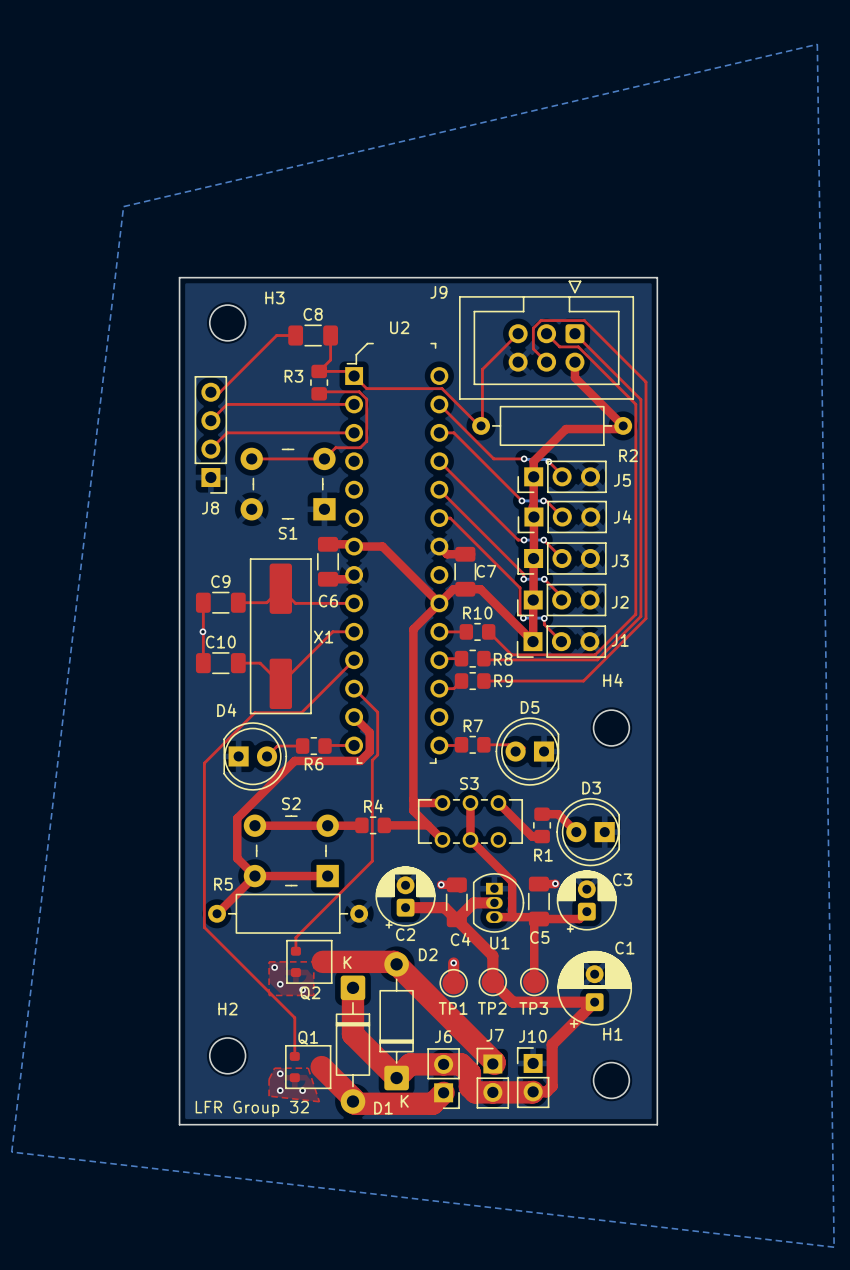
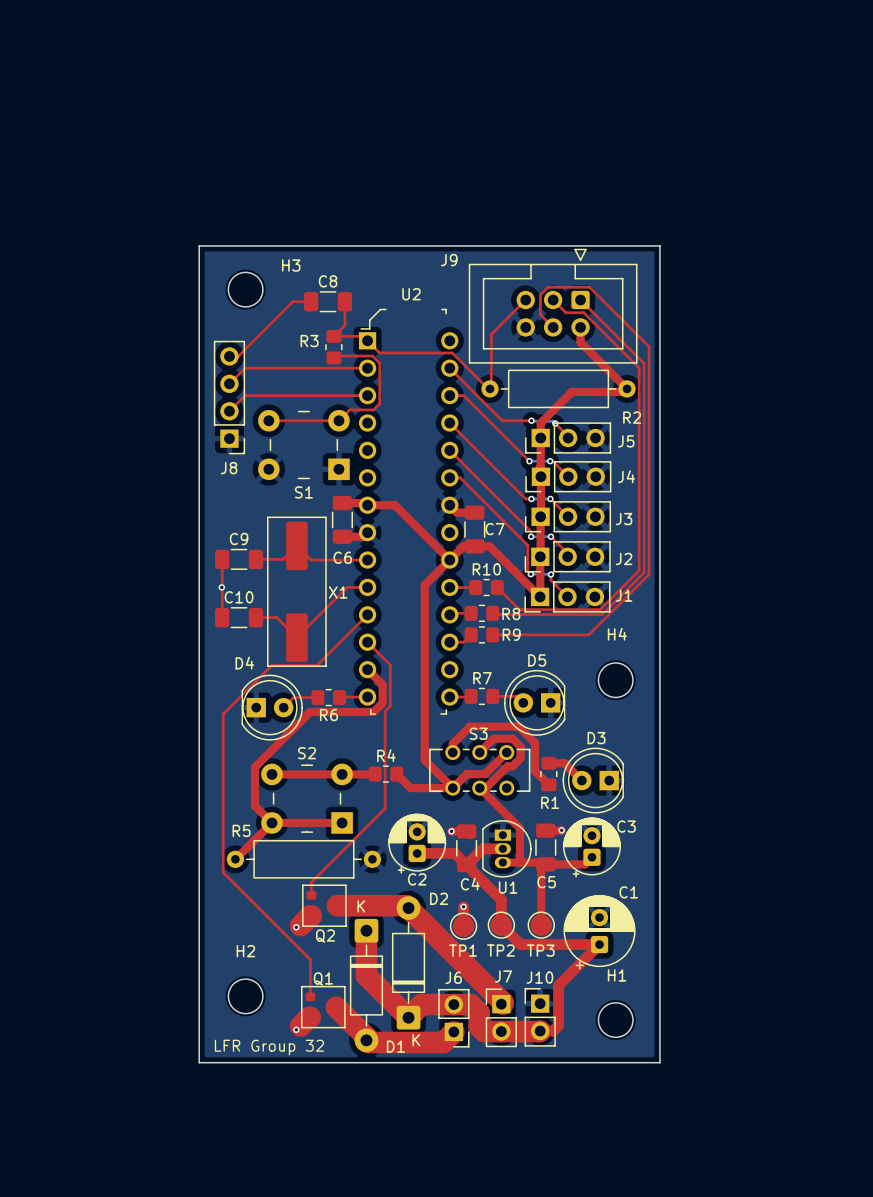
bottom zone outline: (817, 44) (123, 206) (11, 1152) (834, 1247) (817, 44) -> none
top track: (413, 799) (416, 803) (442, 803) -> none
top track: (470, 803) (470, 839) -> (479, 752) (493, 738) (512, 738) (520, 746) (520, 758) (512, 766) (507, 766) (485, 788) (479, 788)
top track: (498, 803) (532, 836) (542, 836) -> (452, 752) (452, 743) (470, 726) (518, 726) (535, 743) (535, 771) (548, 784)
top track: (384, 825) (427, 825) -> (396, 774) (410, 788) (452, 788) (466, 774) (485, 774) (506, 752)
top zone outline: (269, 961) (269, 995) (313, 995) (313, 961) (269, 961) -> none
via: (274, 967) -> none
top track: none -> (311, 915) (300, 925)
via: (302, 989) -> none
top zone outline: (274, 1068) (308, 1068) (319, 1101) (269, 1096) (269, 1079) (274, 1068) -> none
via: (280, 1073) -> none
top track: none -> (310, 1017) (300, 1026)
via: (302, 1090) -> none

